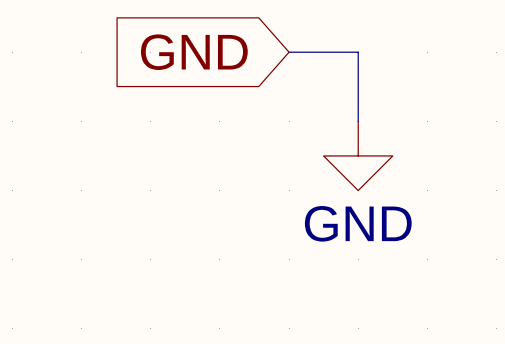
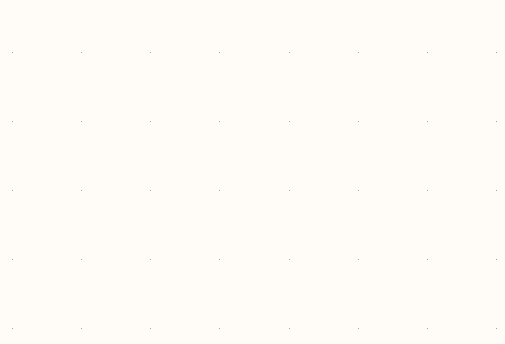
global label: GND (194, 52) -> none
wire: (289, 52) (358, 52) (358, 121) -> none
power symbol: GND (358, 155) -> none

